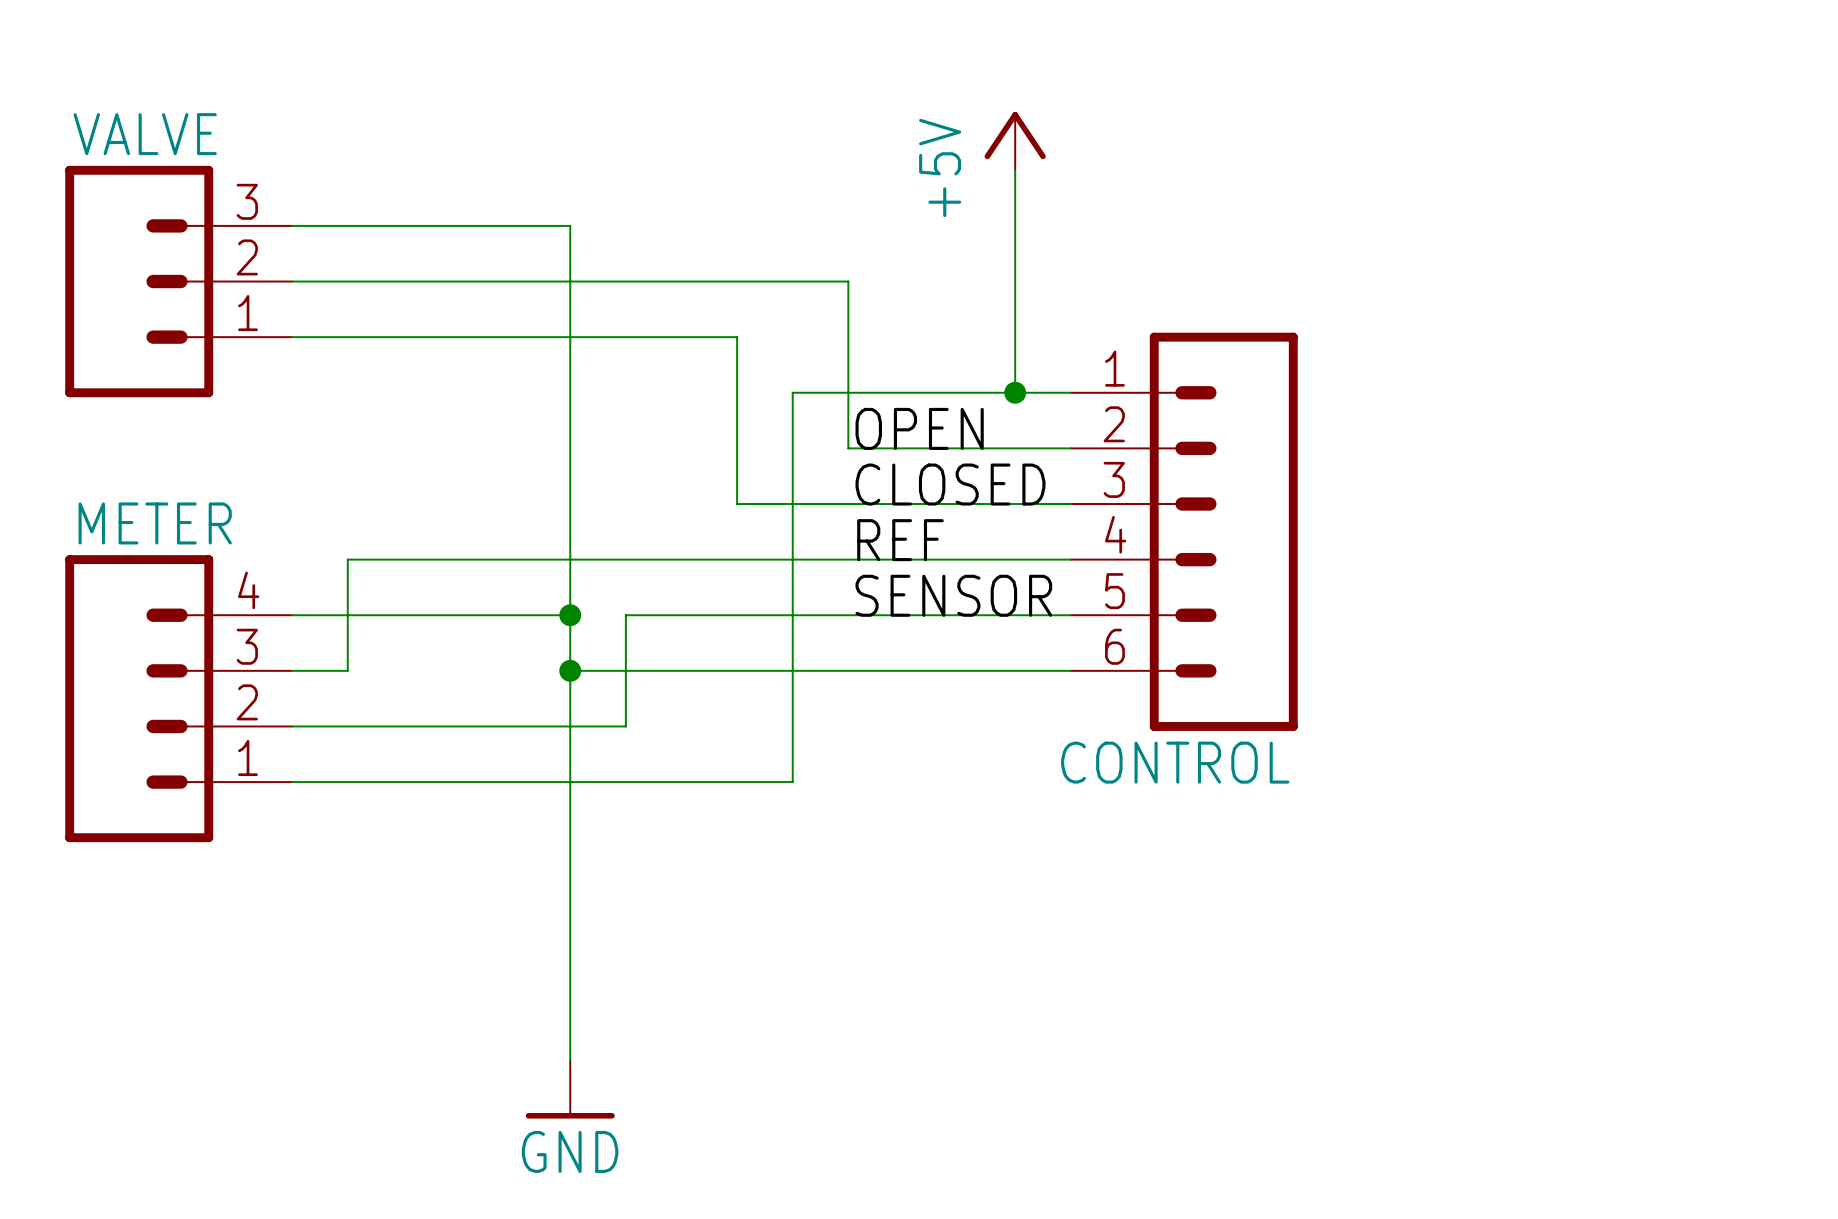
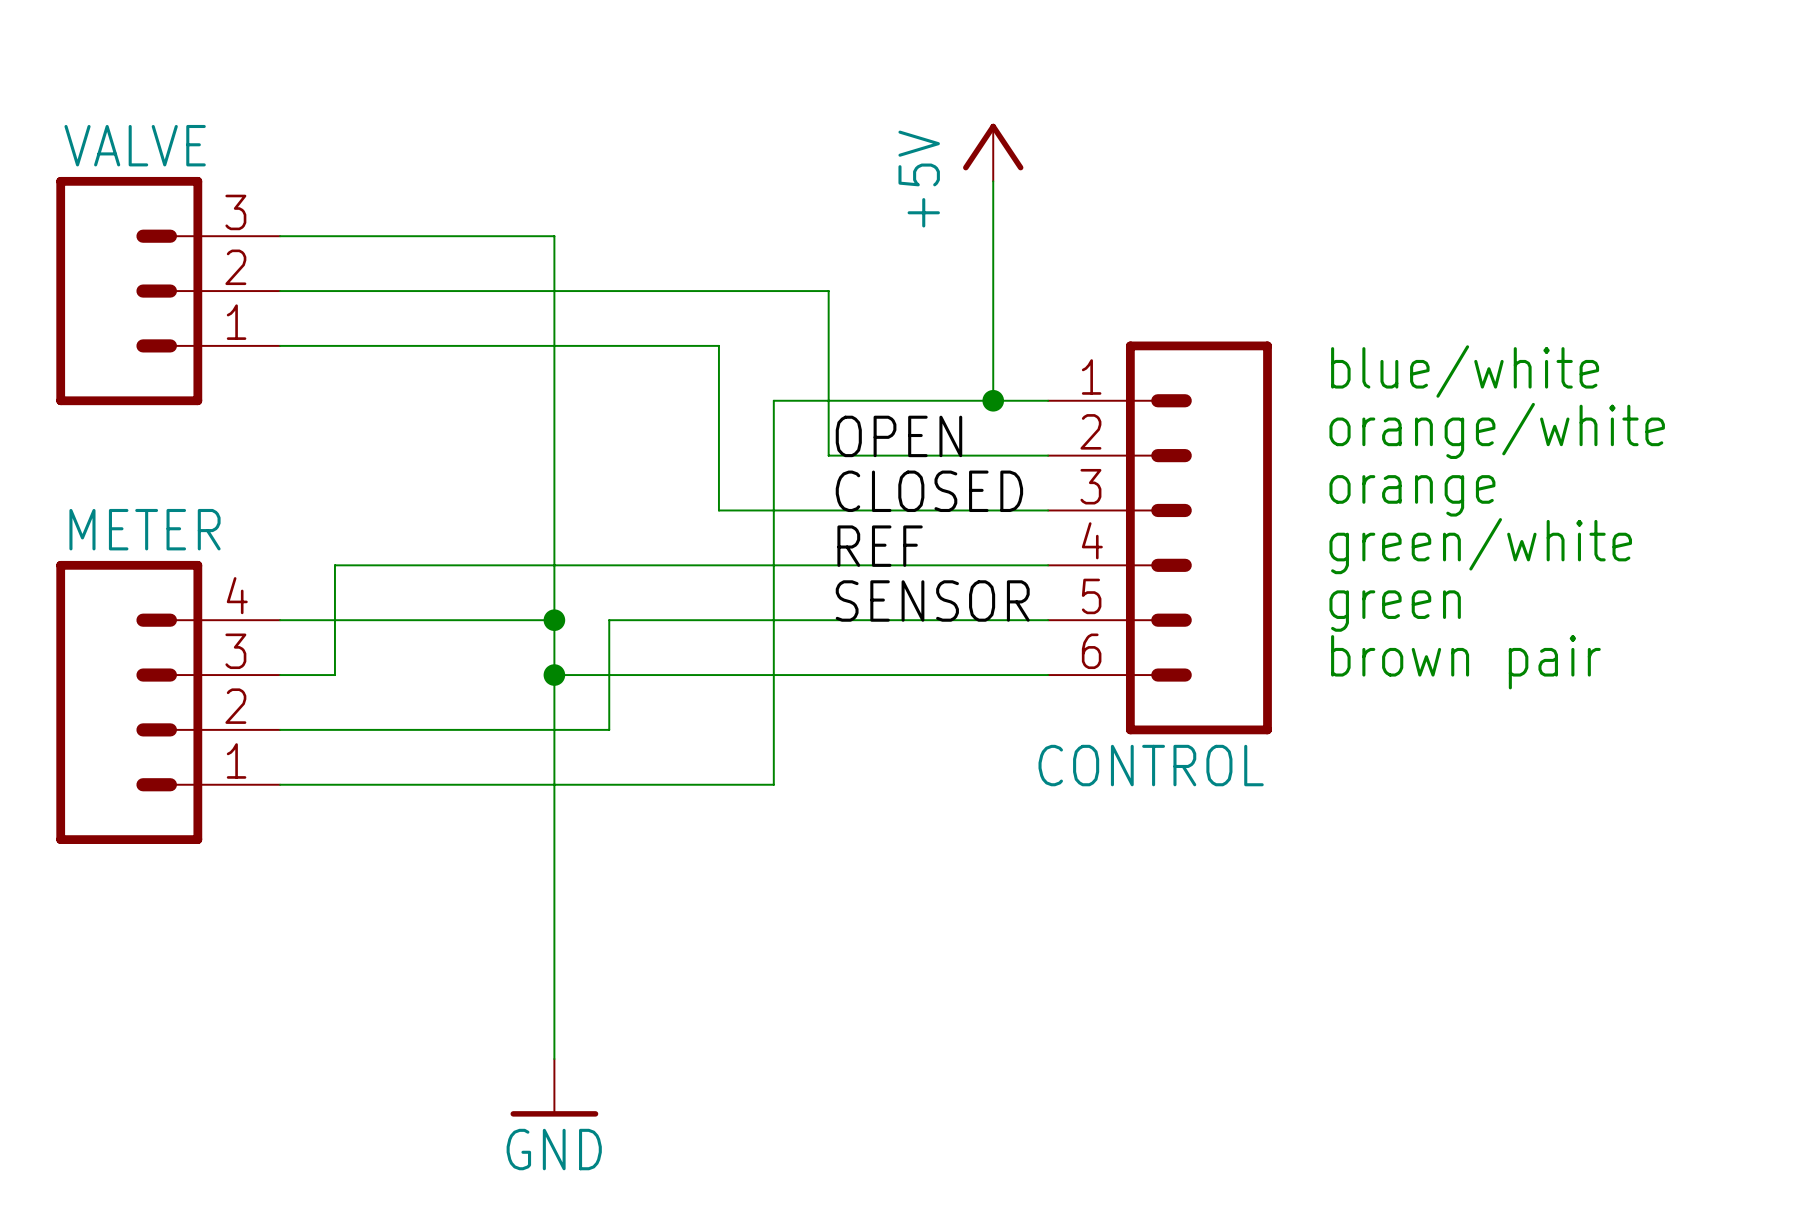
text: none -> blue/white (1465, 371)
text: none -> orange/white (1497, 430)
text: none -> orange (1412, 495)
text: none -> green/white (1480, 546)
text: none -> green (1395, 611)
text: none -> brown pair (1465, 662)

